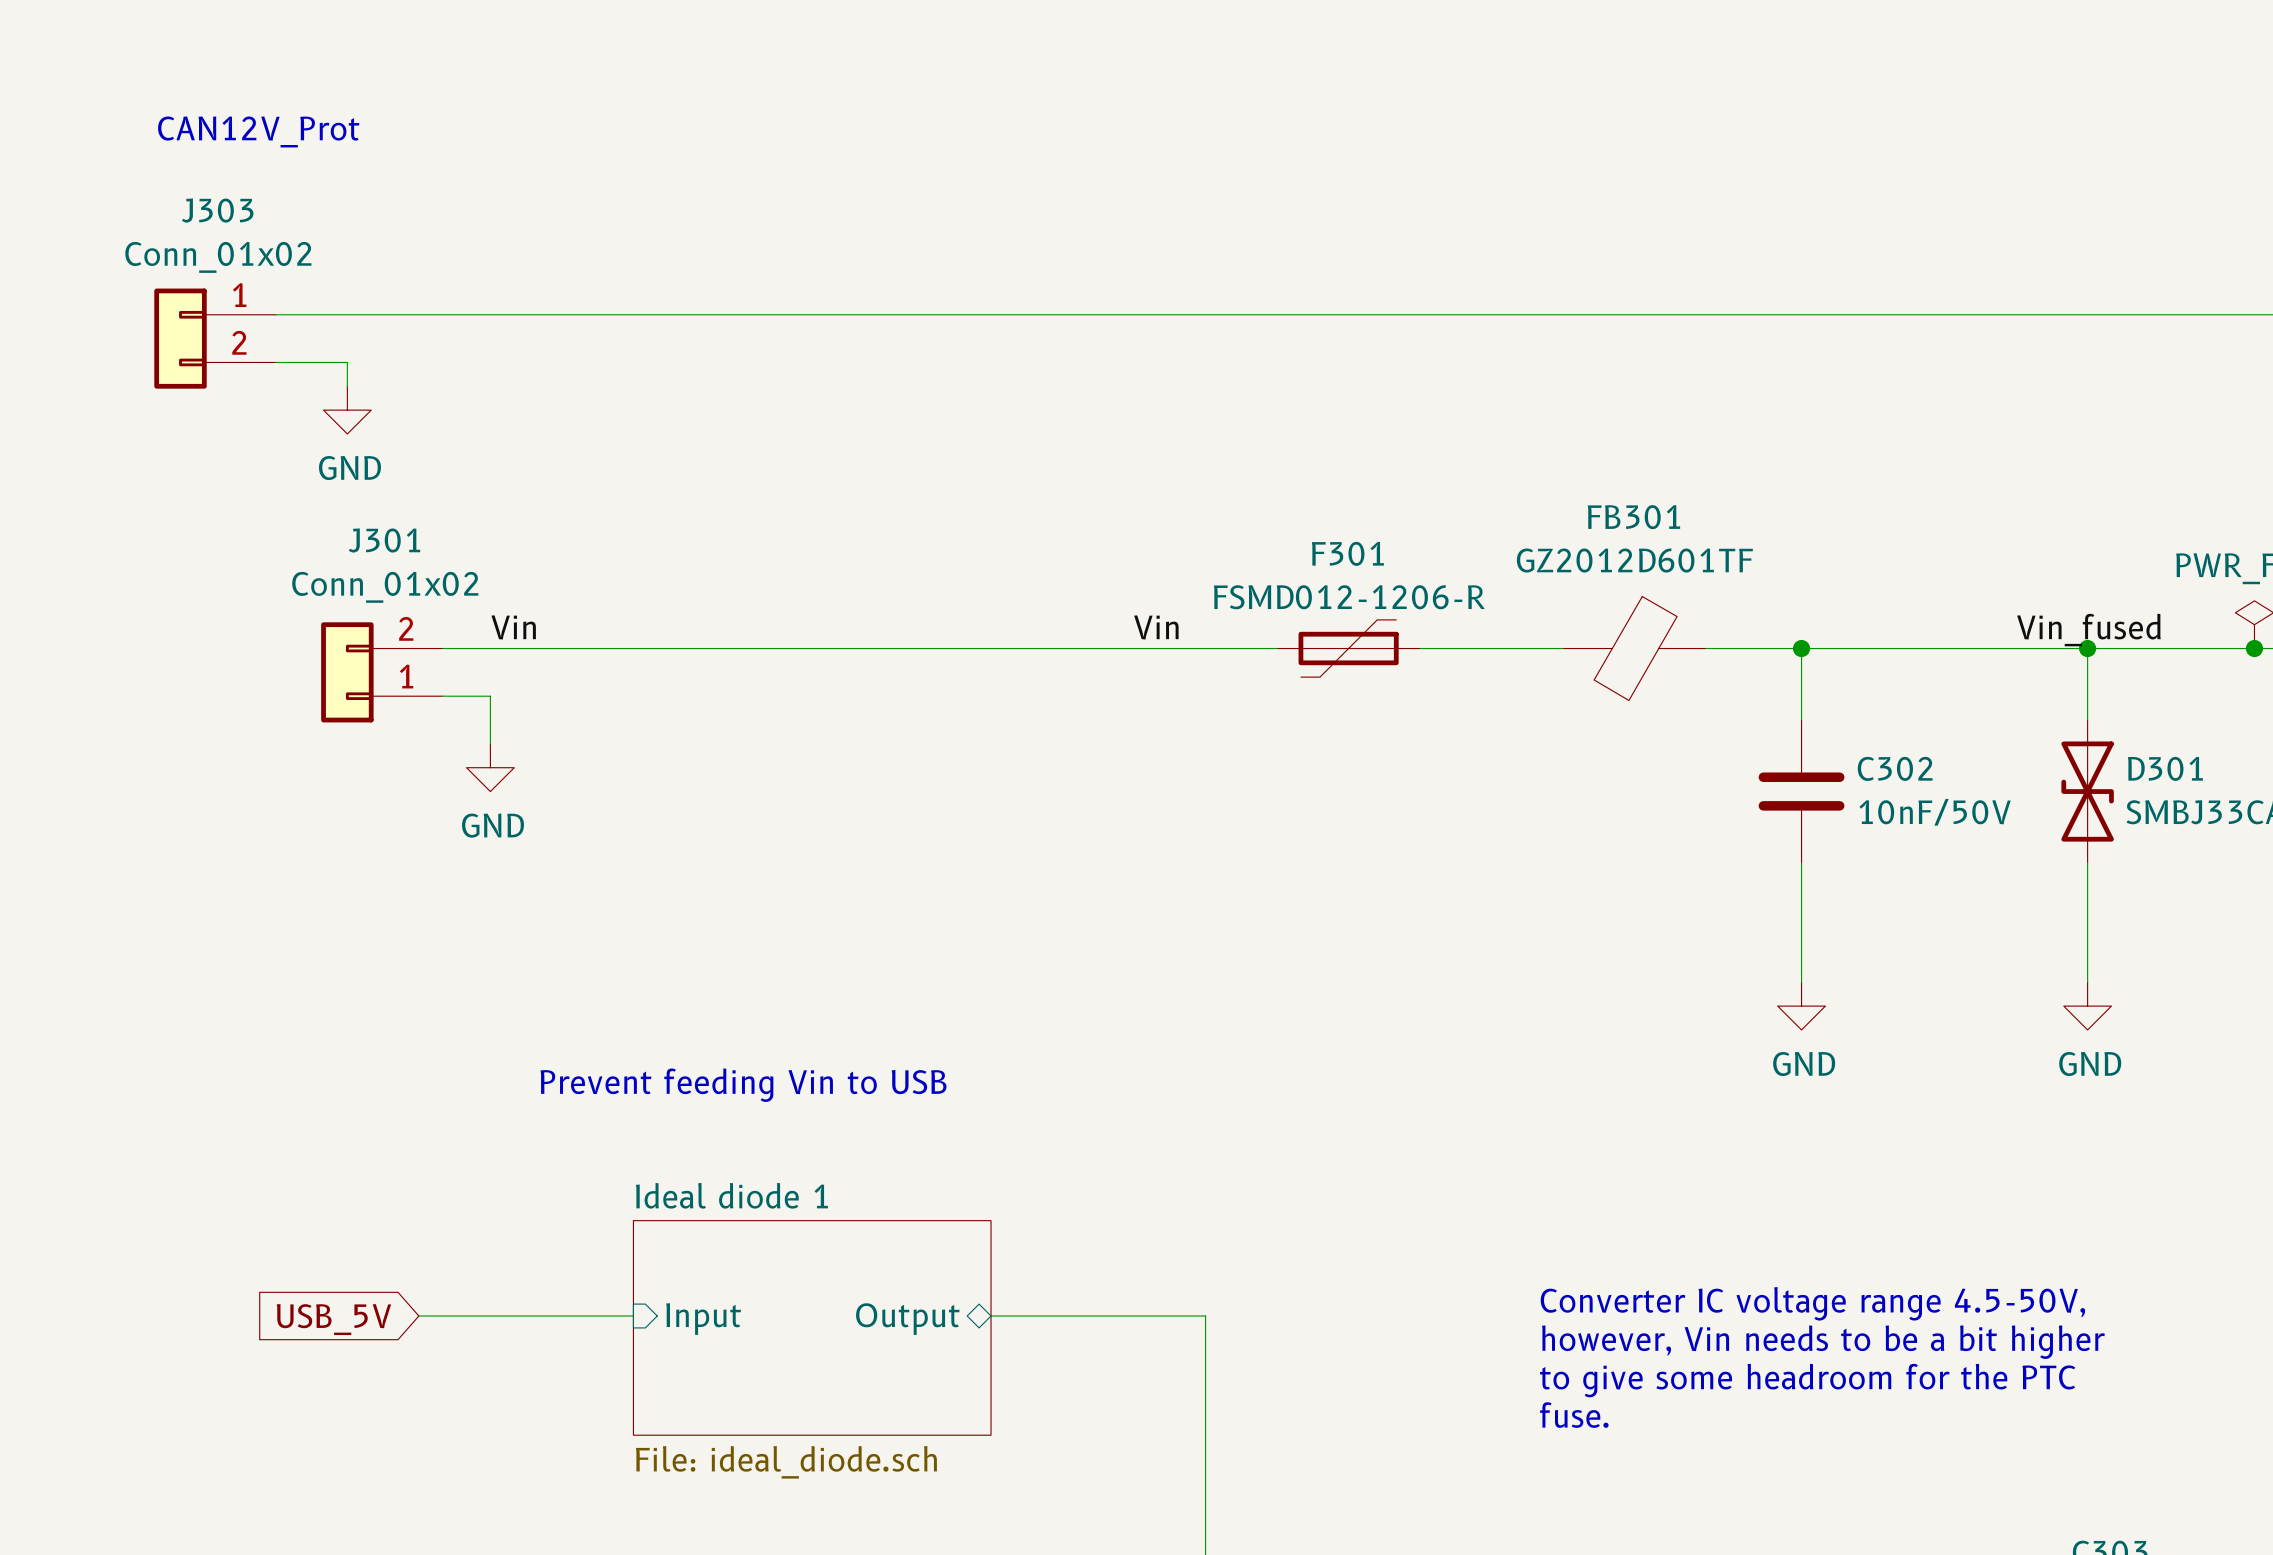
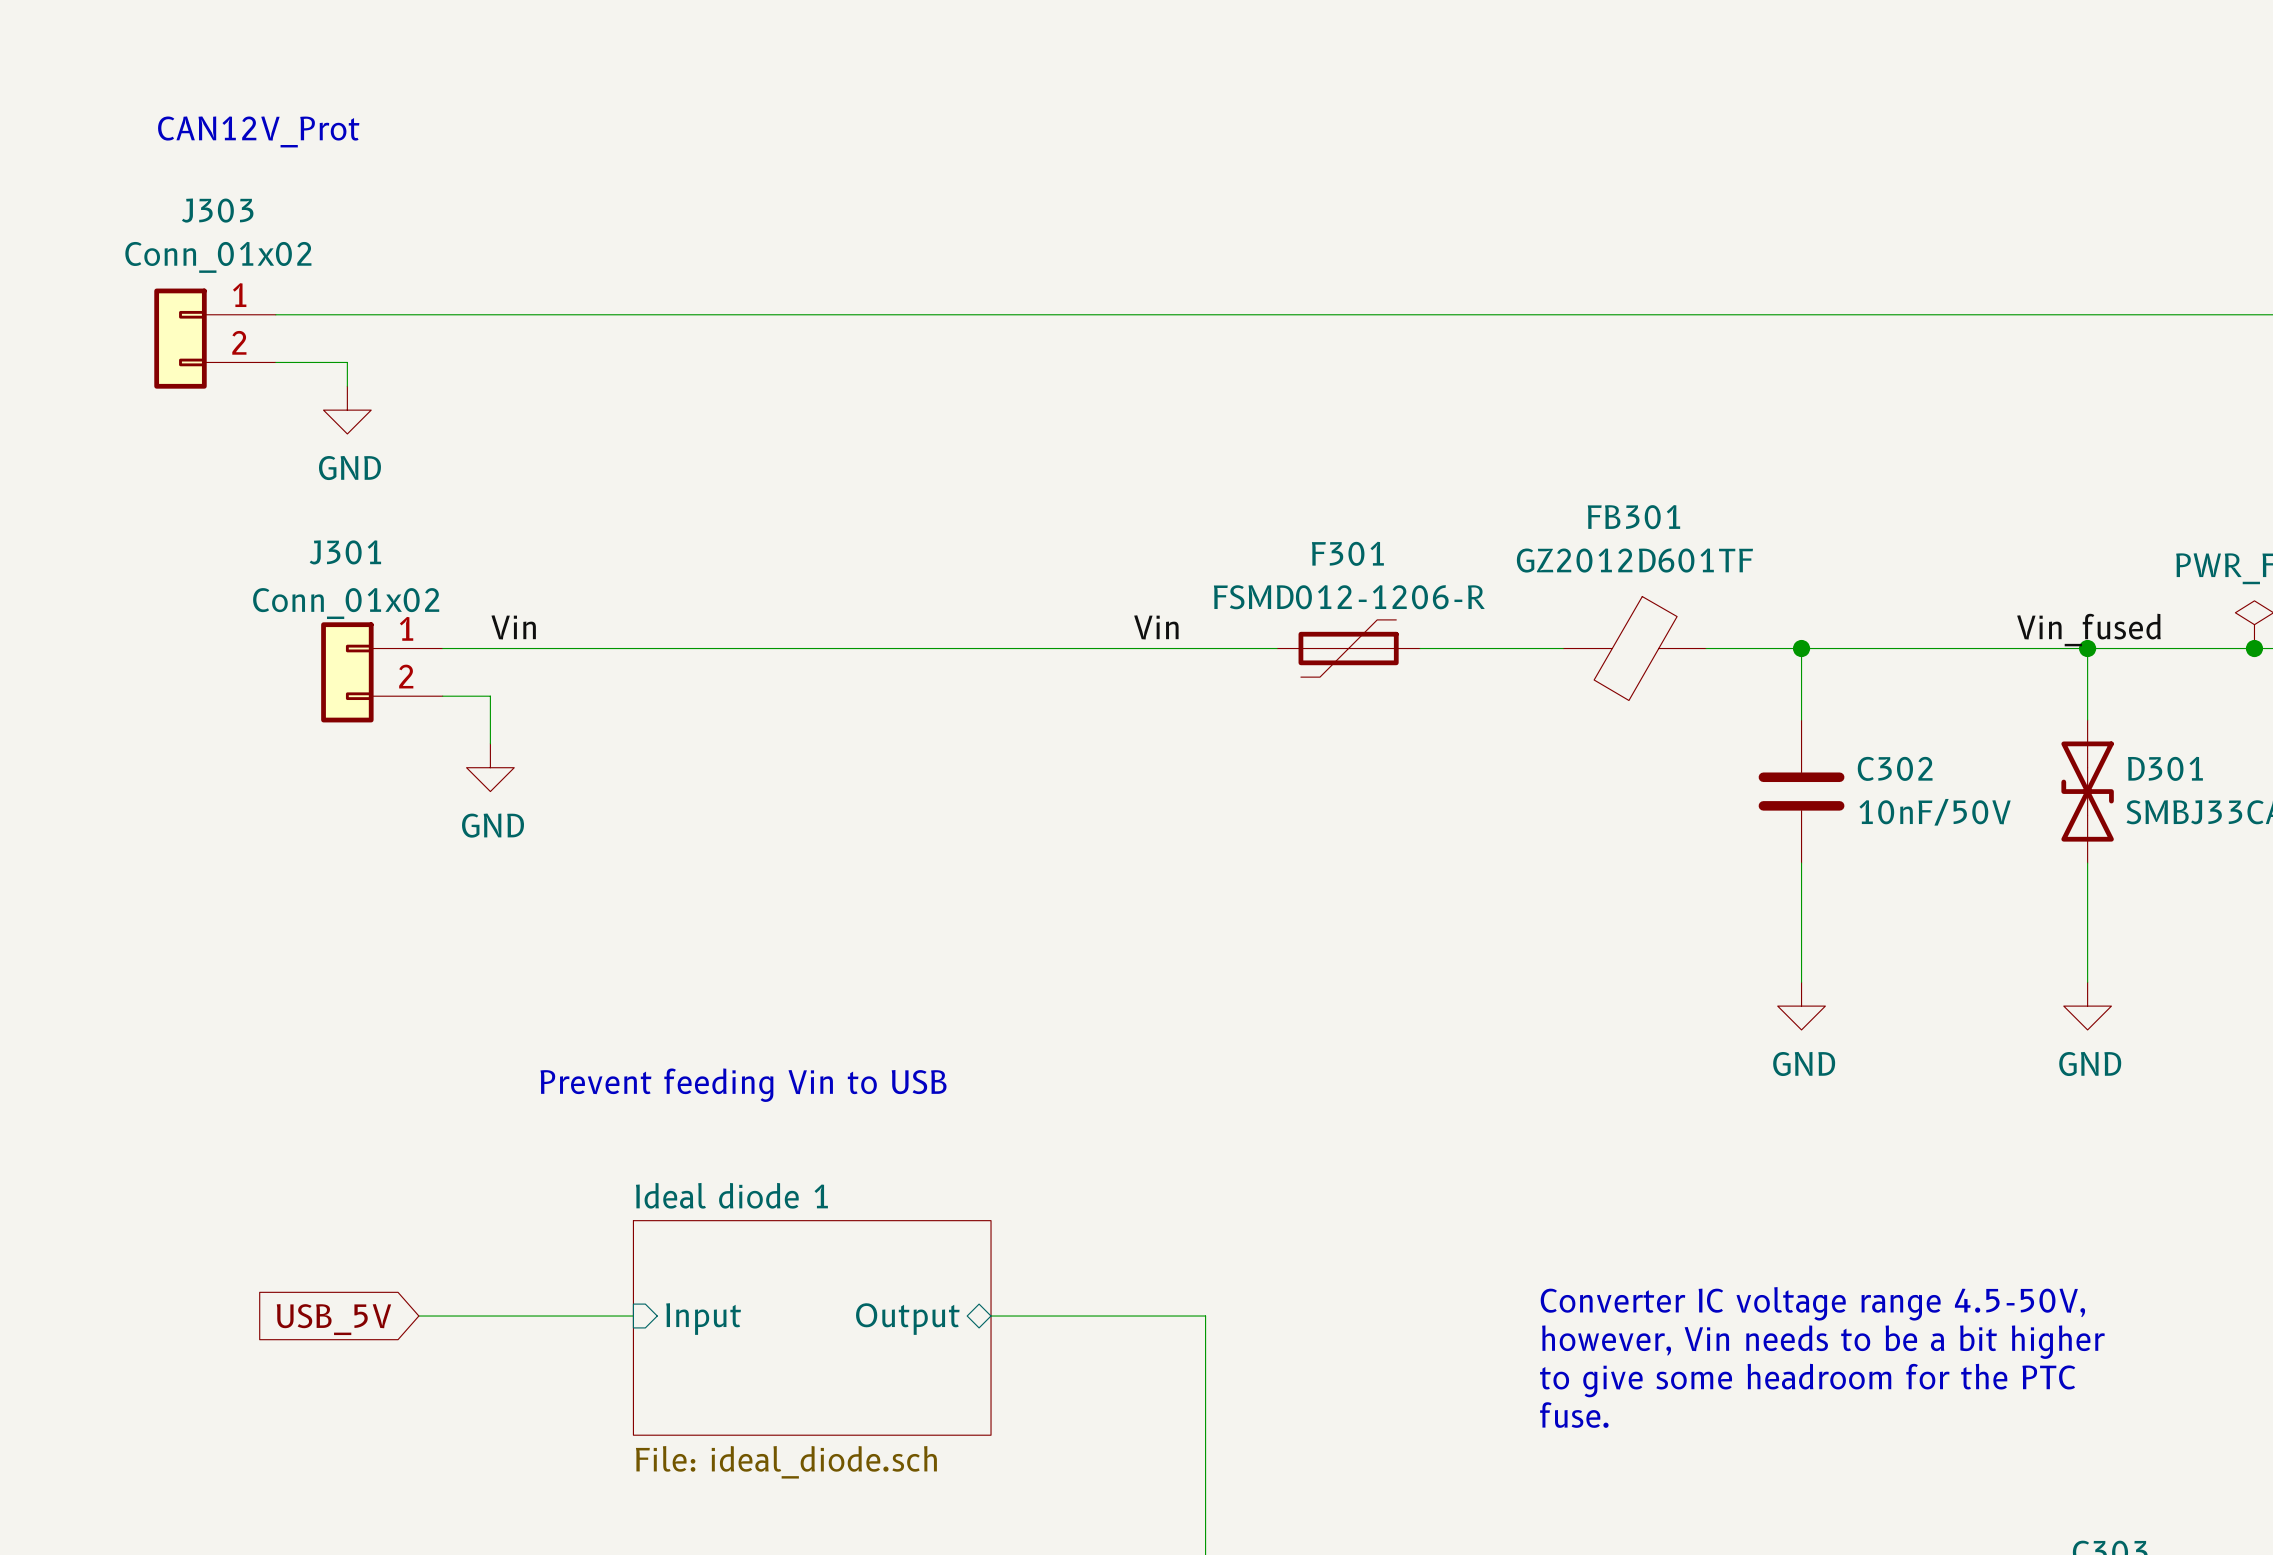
J301 name position: J301 (384, 540) -> J301 (345, 552)
J301 value position: Conn_01x02 (385, 587) -> Conn_01x02 (346, 603)
J301 flip: as is (347, 672) -> up-down (347, 672)

